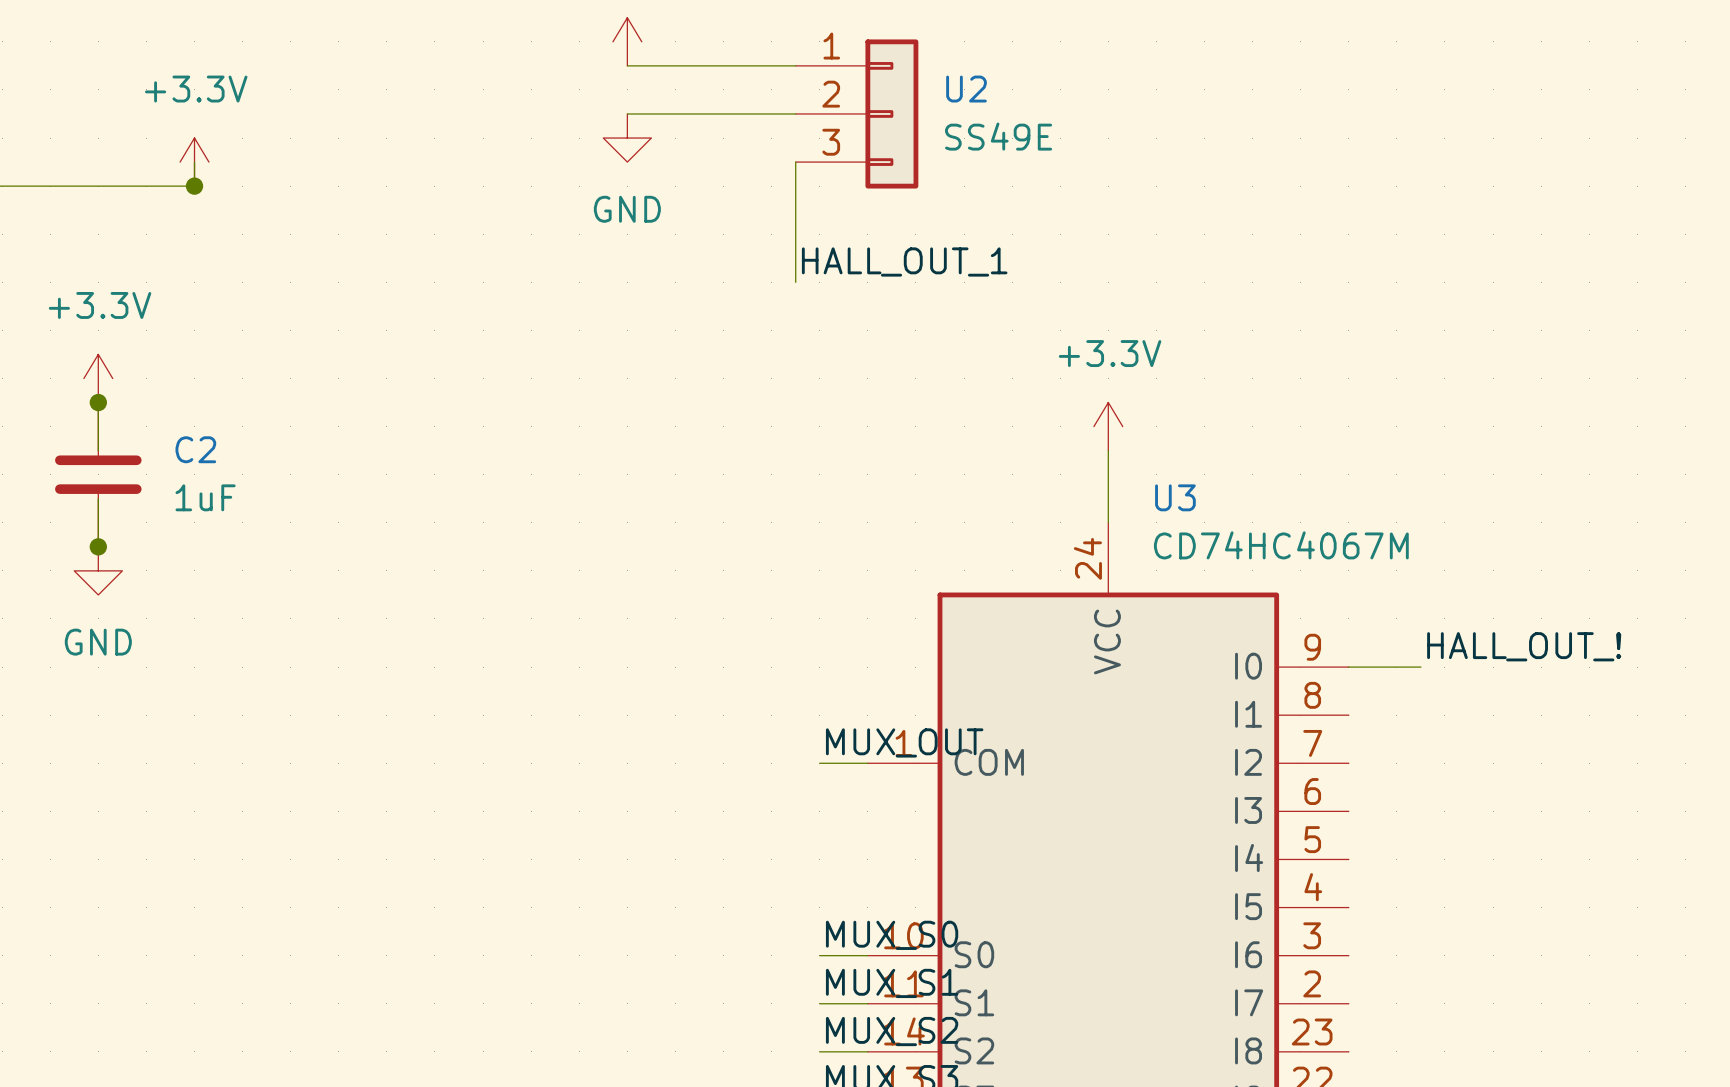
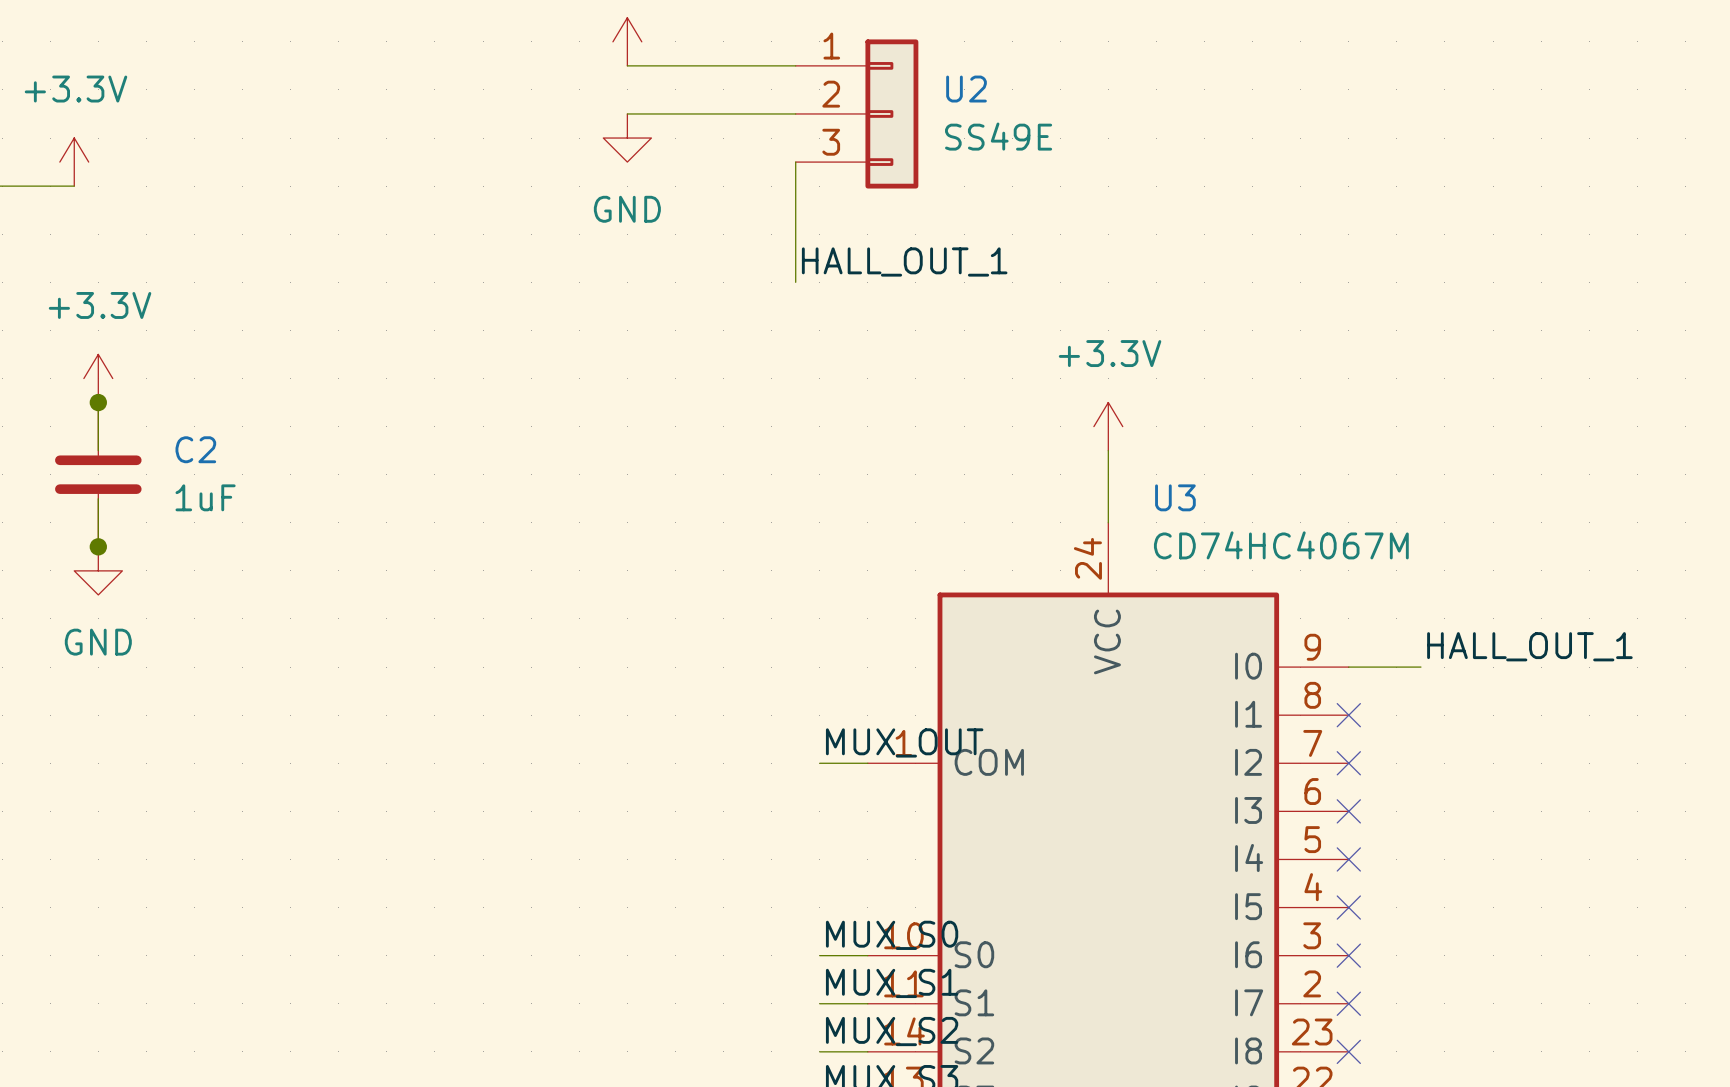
wire: (194, 162) (194, 186) (74, 186) -> none
power symbol position: +3.3V (194, 162) -> +3.3V (74, 162)
junction: (194, 186) -> none
label: HALL_OUT_! (1524, 646) -> HALL_OUT_1 (1529, 646)
no-connect mark: none -> (1348, 715)
no-connect mark: none -> (1348, 763)
no-connect mark: none -> (1348, 811)
no-connect mark: none -> (1348, 859)
no-connect mark: none -> (1348, 907)
no-connect mark: none -> (1348, 955)
no-connect mark: none -> (1348, 1003)
no-connect mark: none -> (1348, 1051)

